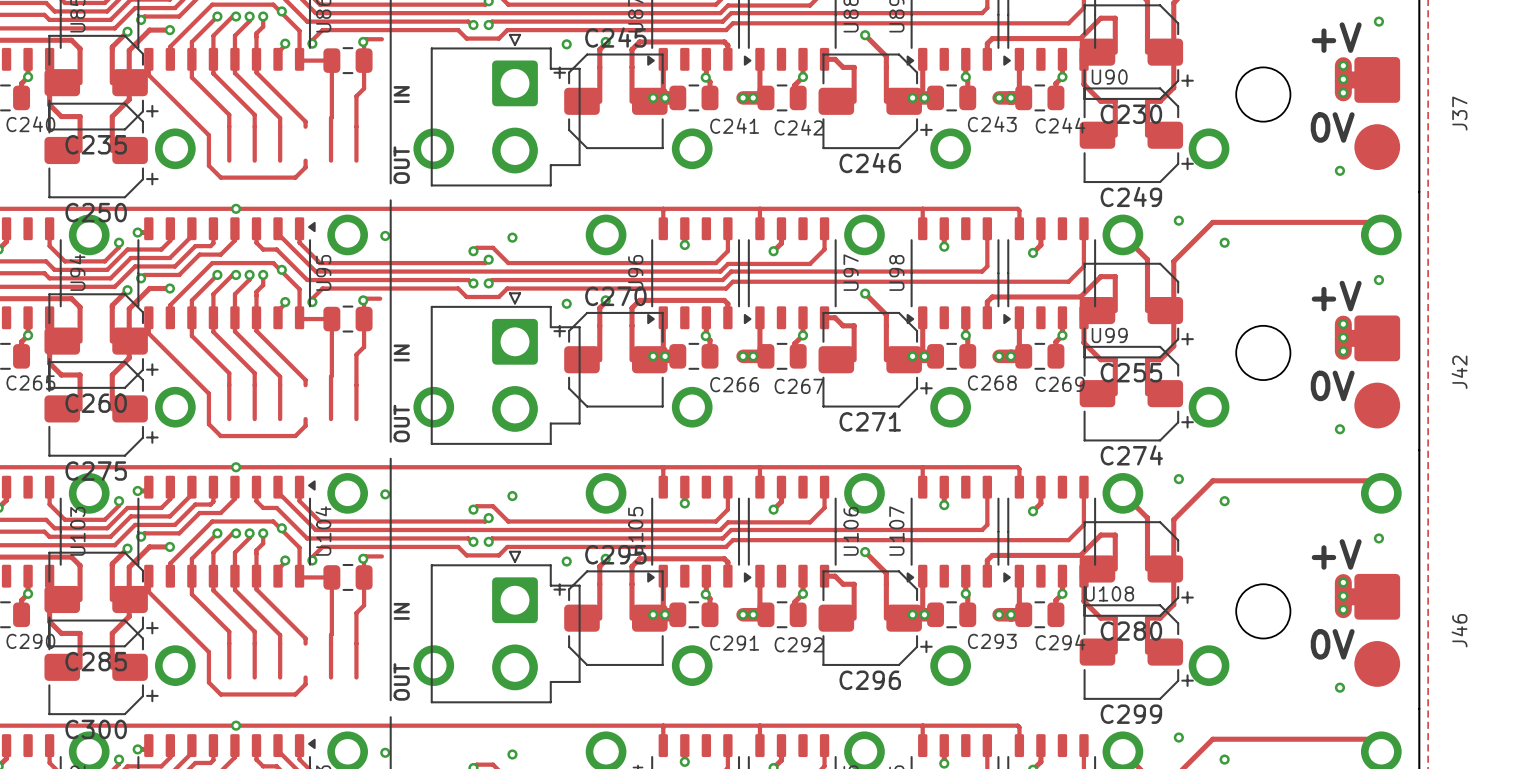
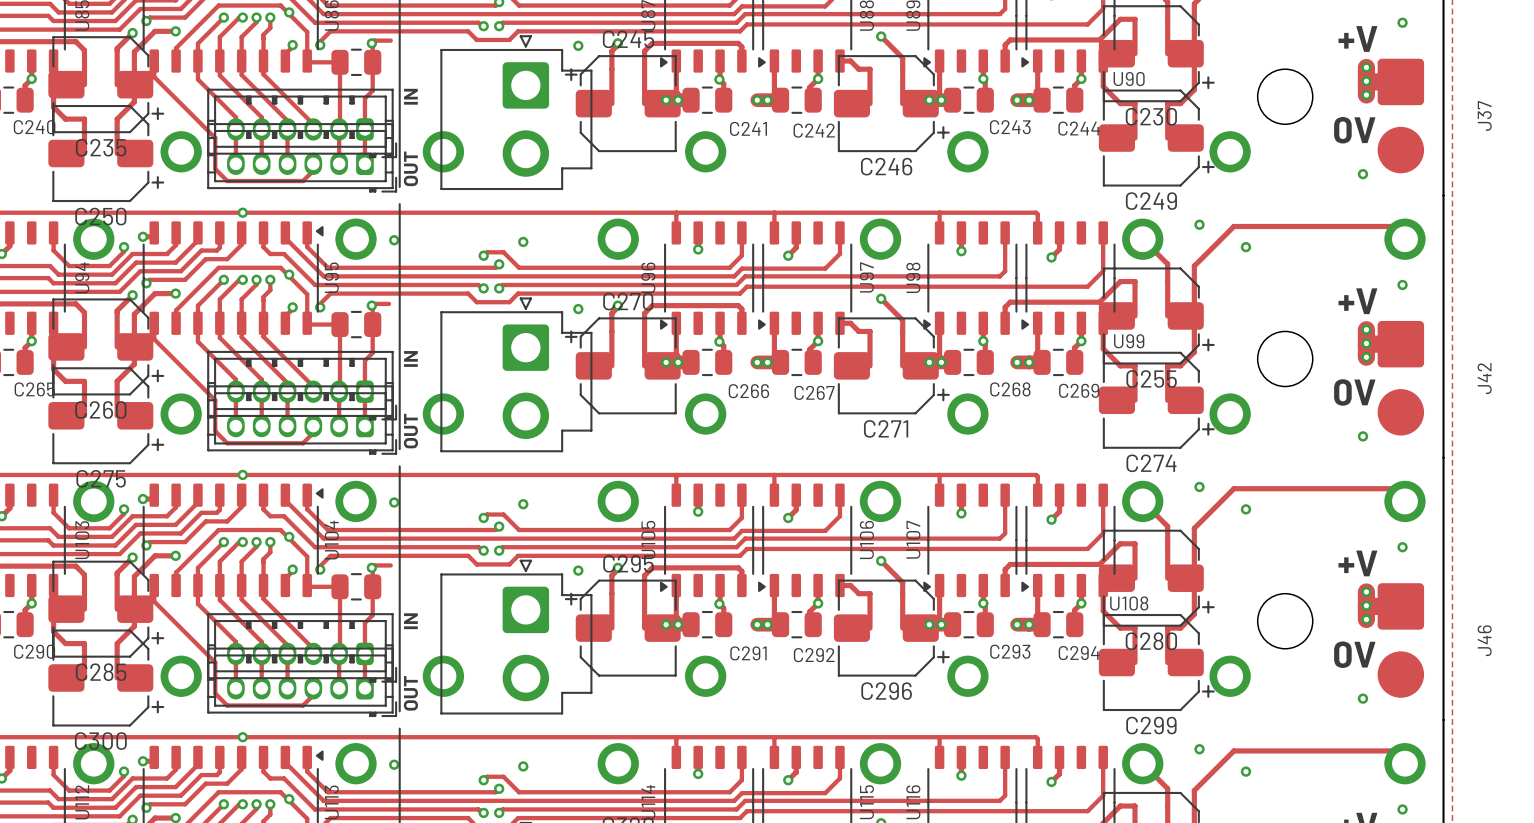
part: none -> (302, 140)
part: none -> (302, 402)
part: none -> (302, 665)

